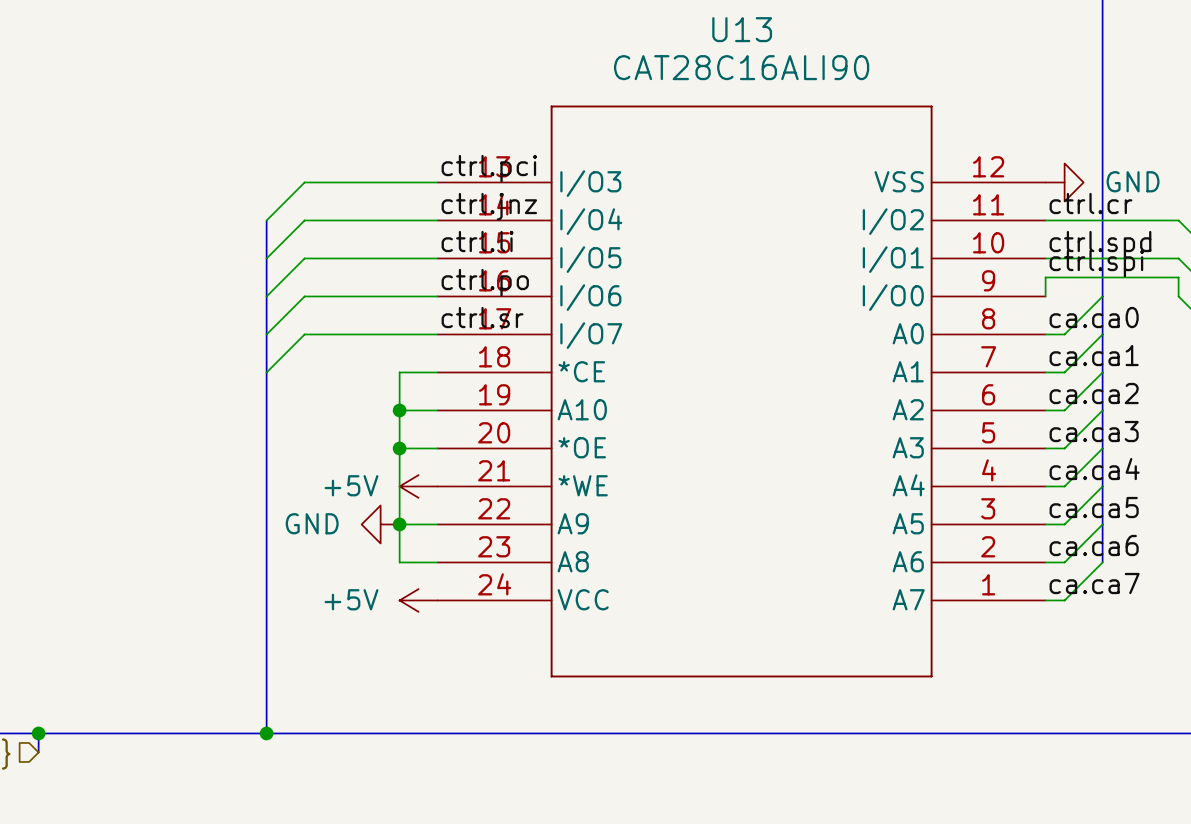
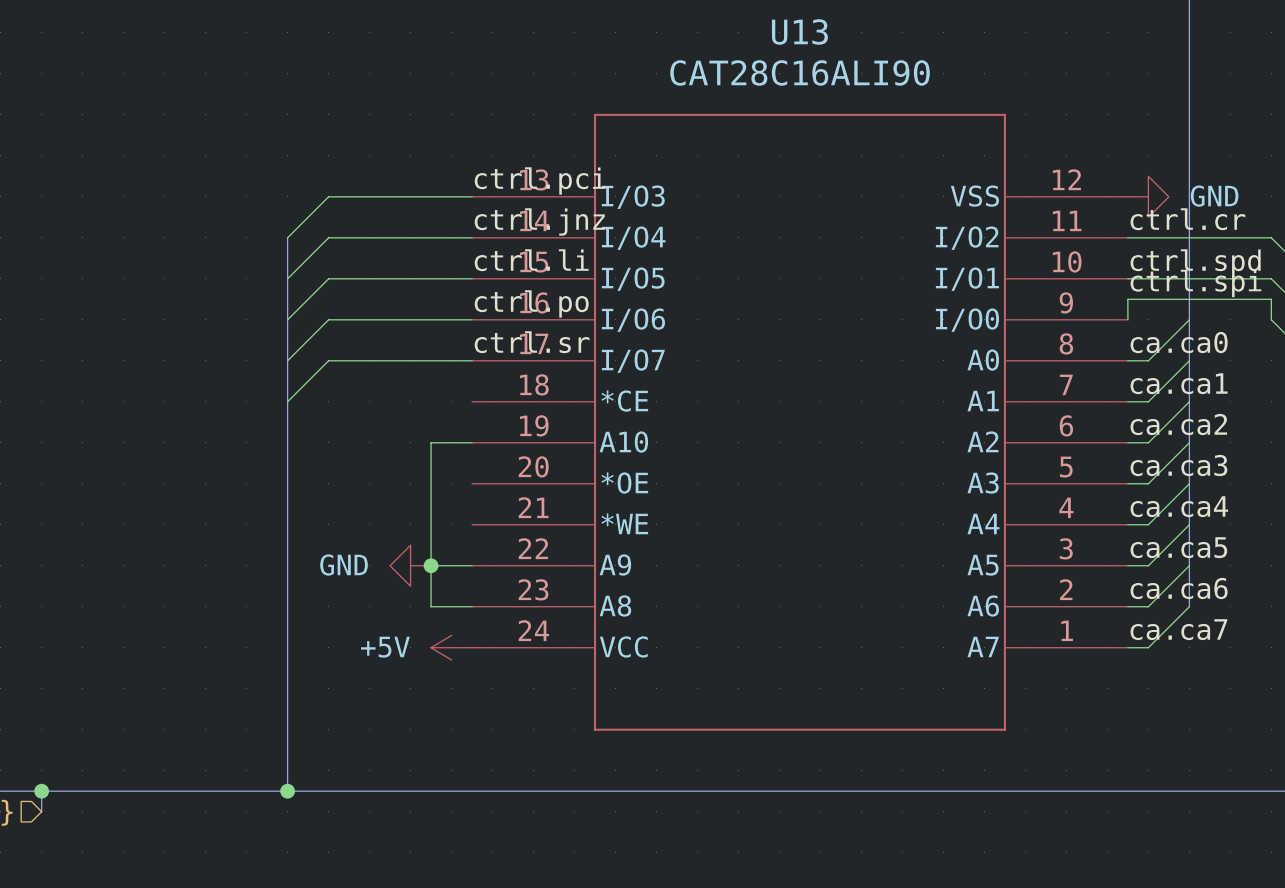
wire: (437, 372) (399, 372) (399, 410) -> none
junction: (399, 410) -> none
wire: (399, 448) (437, 448) -> none
junction: (399, 448) -> none
power symbol: +5V (418, 486) -> none

